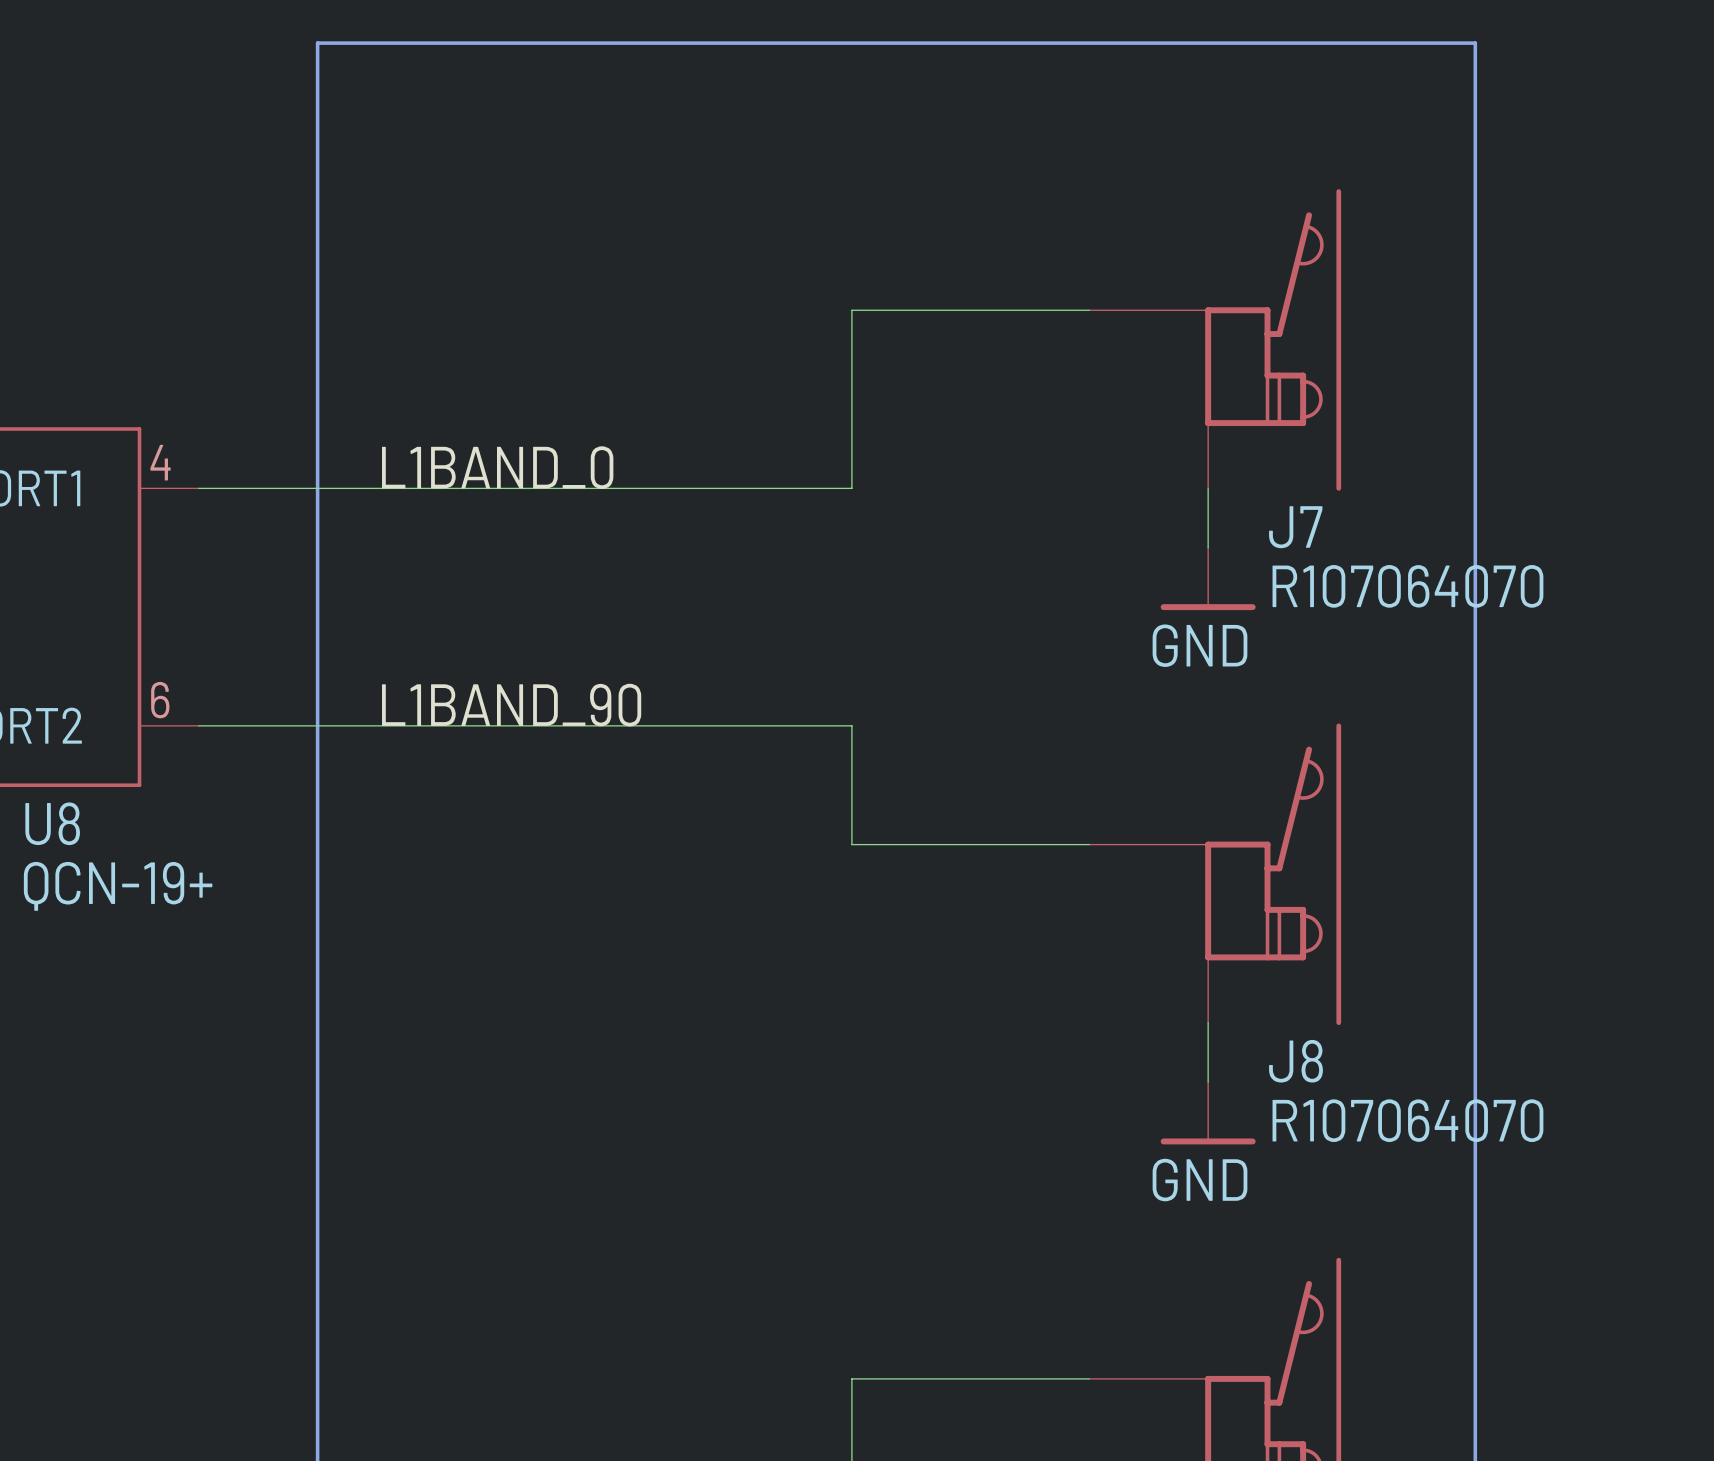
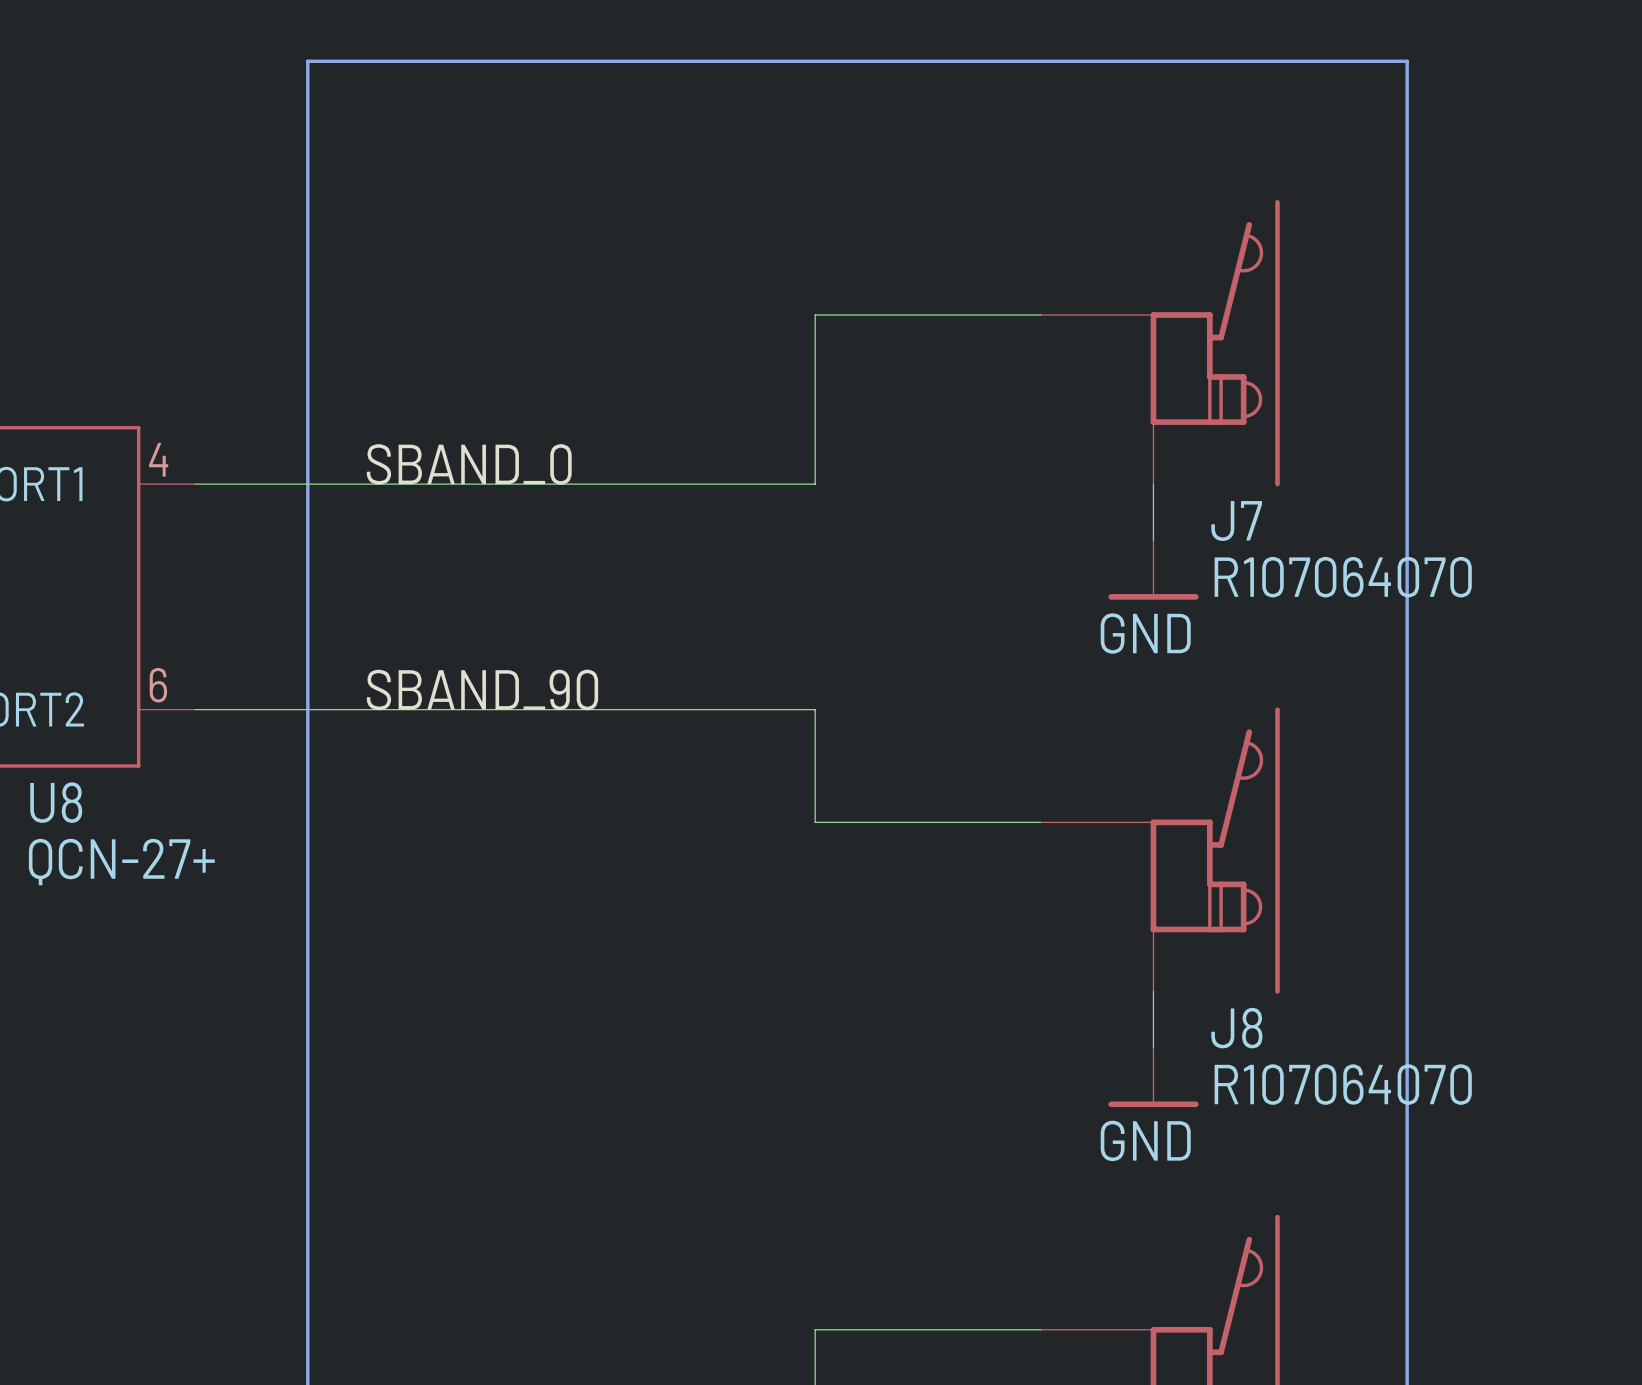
label: L1BAND_0 (497, 467) -> SBAND_0 (469, 464)
label: L1BAND_90 (511, 705) -> SBAND_90 (482, 689)
U8 value: QCN-19+ (118, 886) -> QCN-27+ (121, 862)

